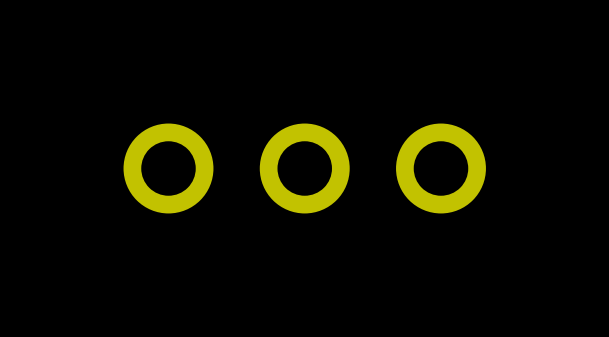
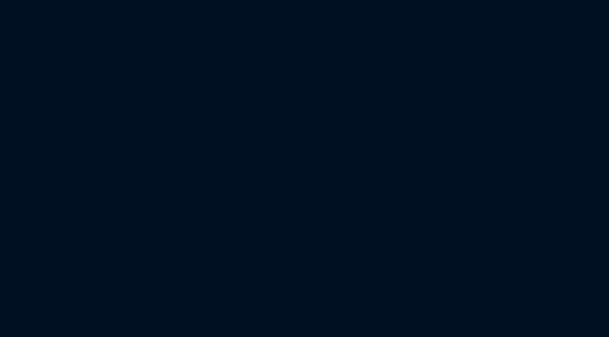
part: (304, 168) -> none

